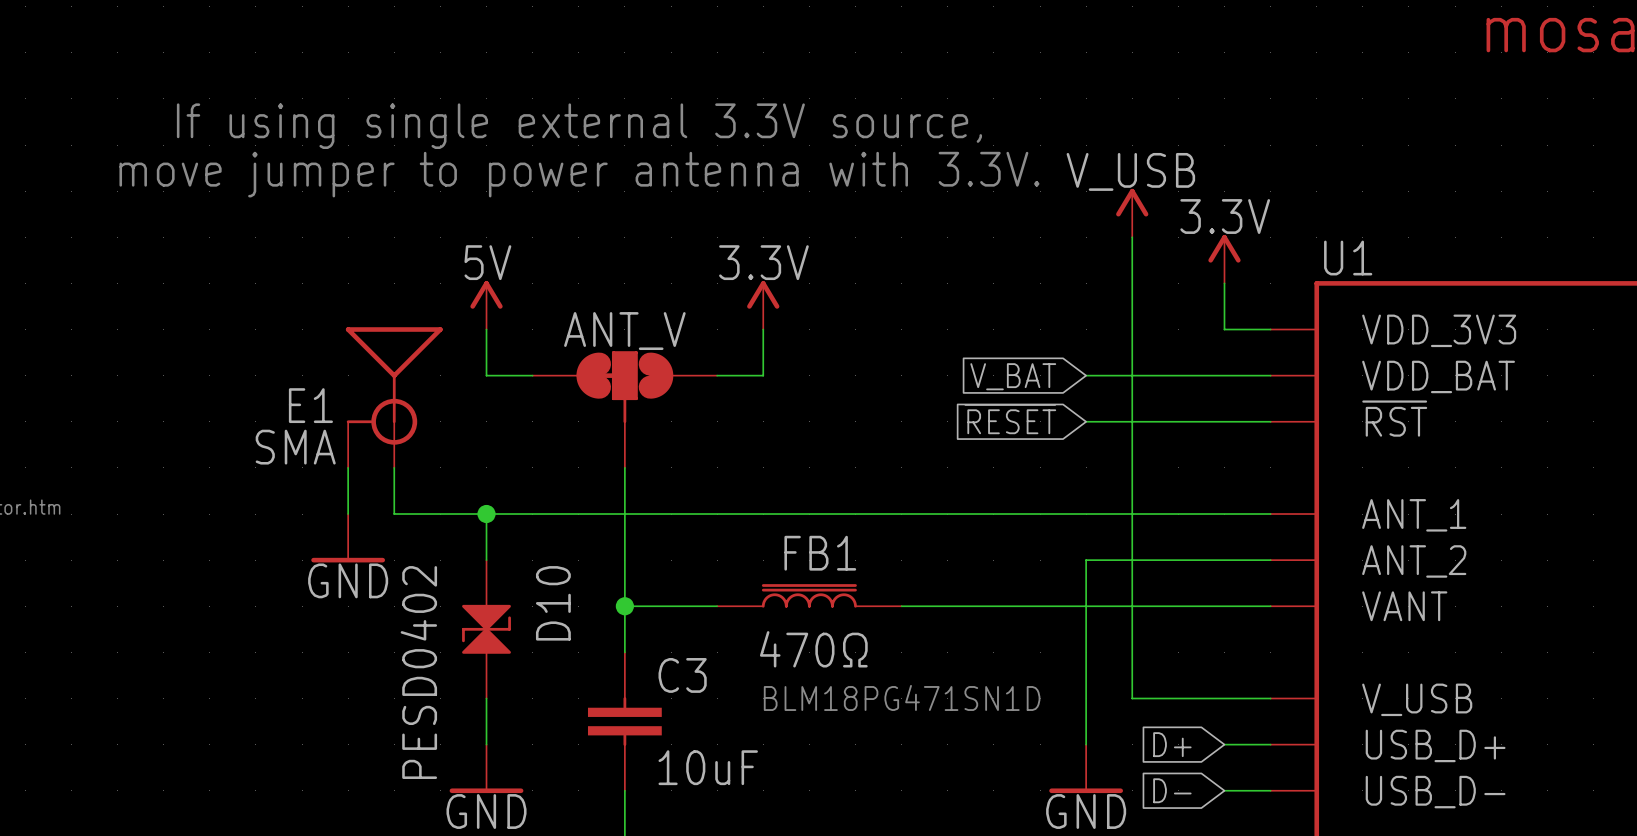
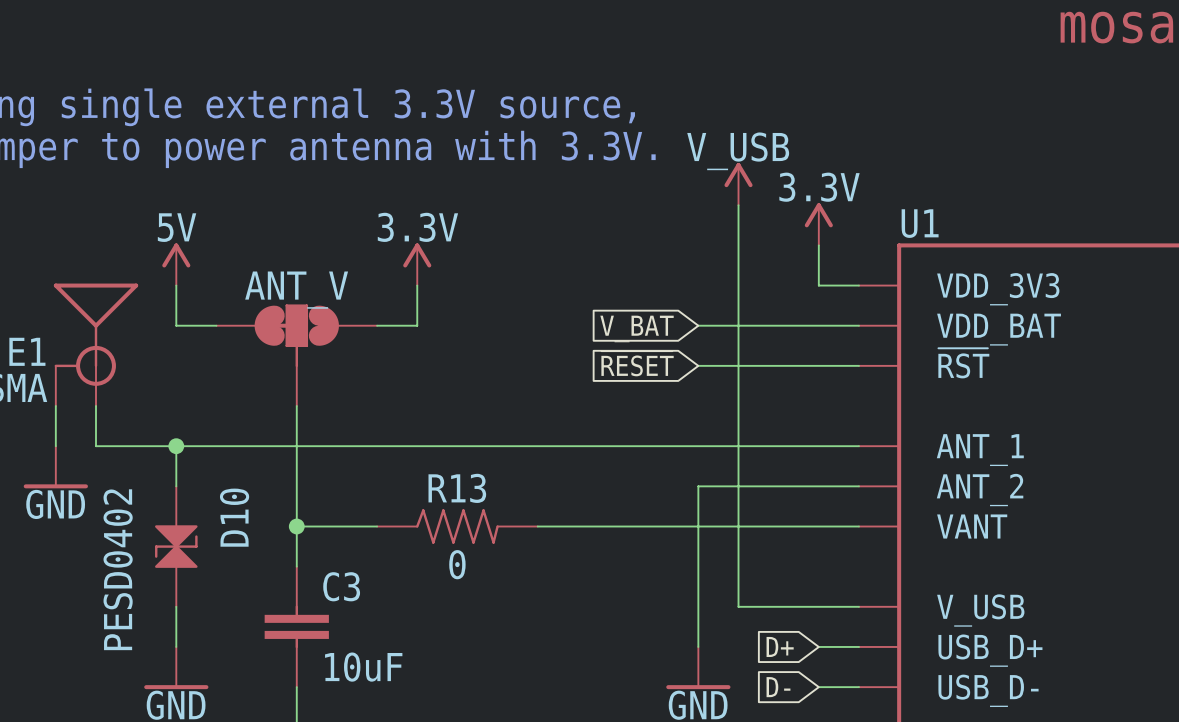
FB1: 470Ω (809, 595) -> none
R13: none -> 0 (457, 526)
text: BLM18PG471SN1D (902, 697) -> none

